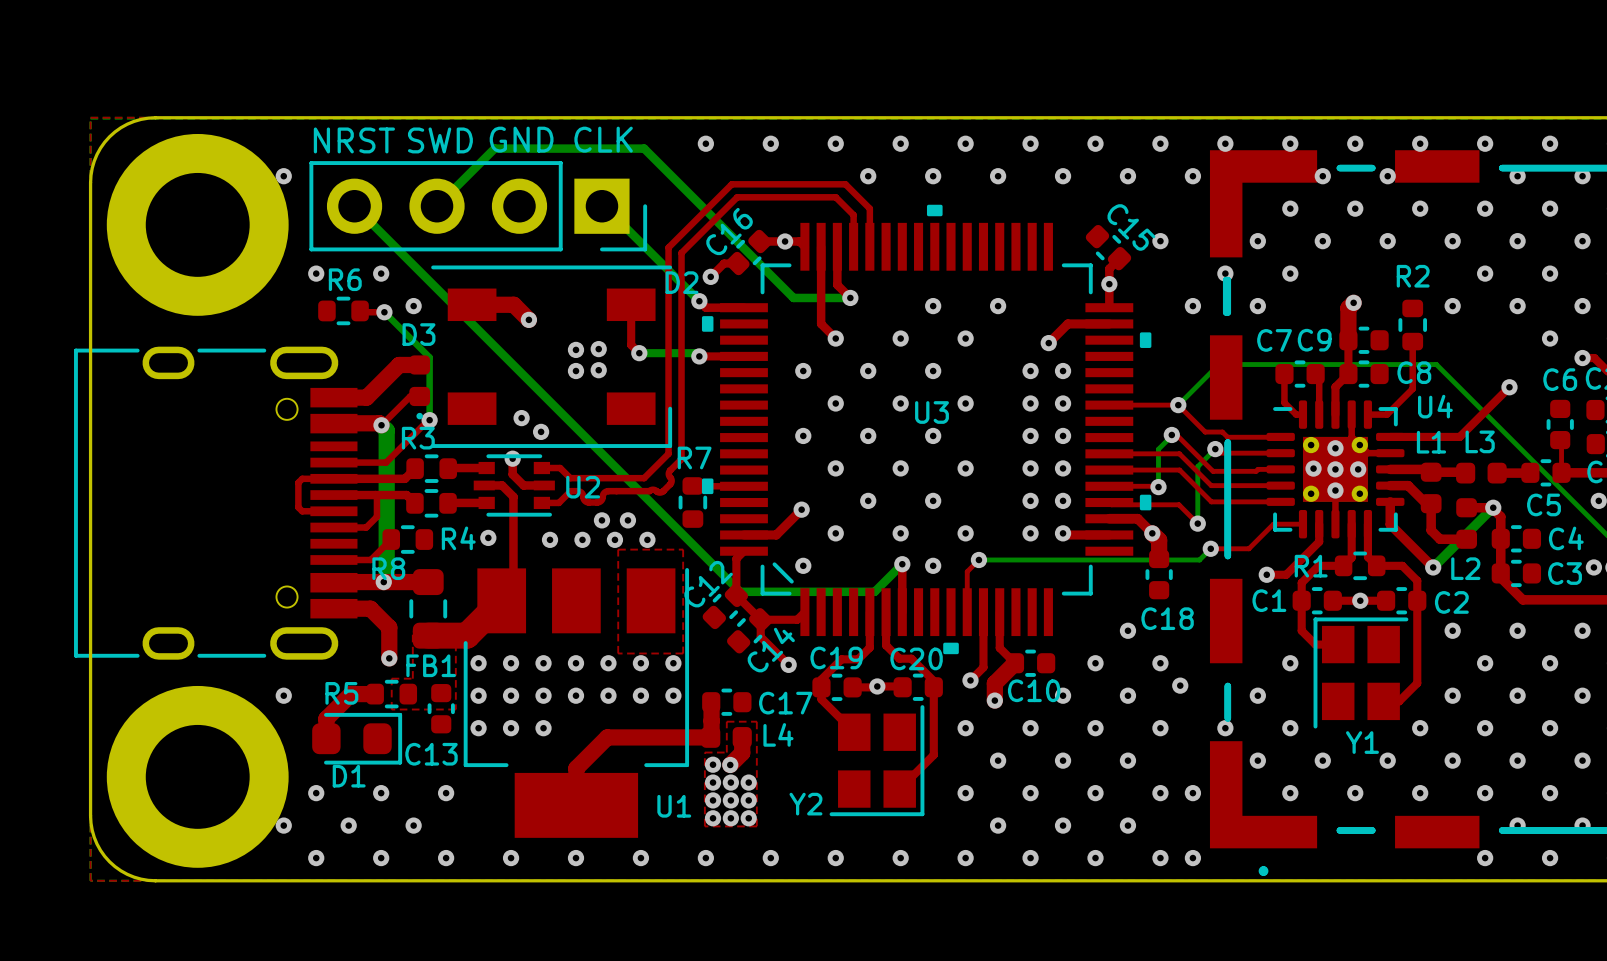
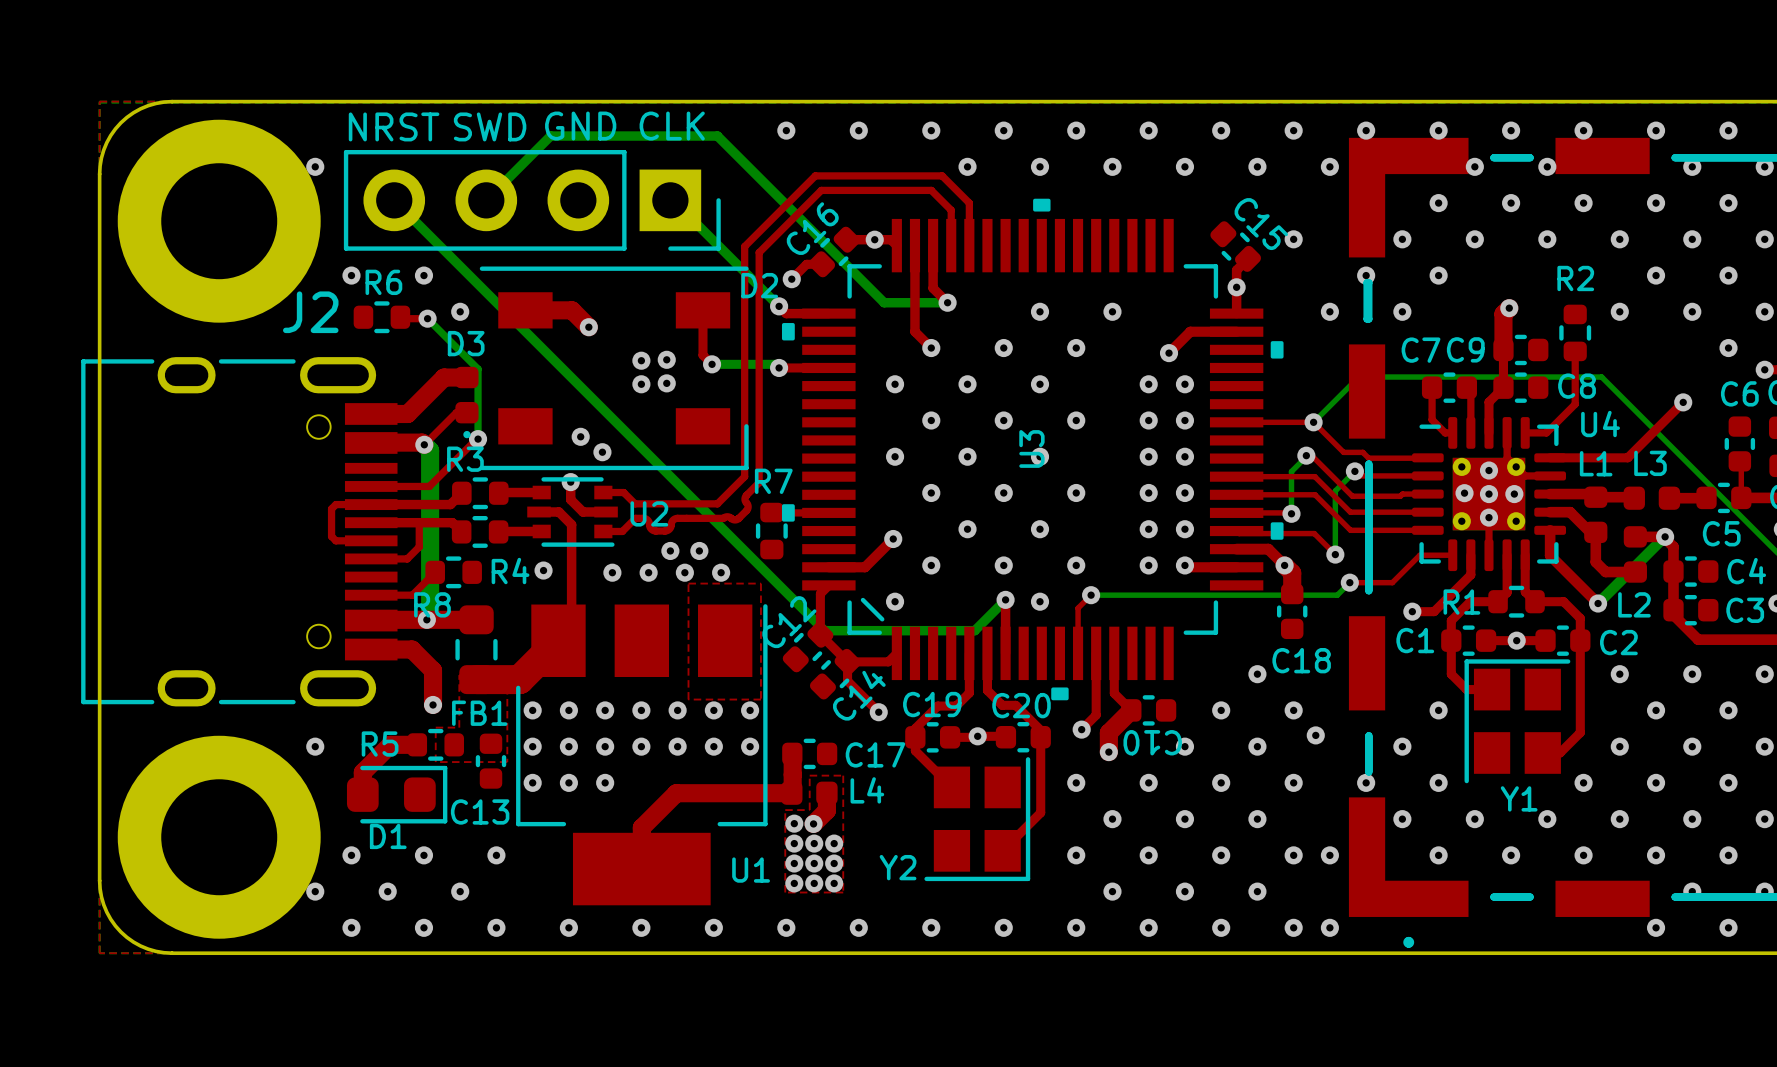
J2 name: none -> J2 (310, 312)
U3 name rotation: 0° (932, 412) -> 90° counterclockwise (1031, 448)
C10 name rotation: 0° (1034, 690) -> 180° (1152, 742)

